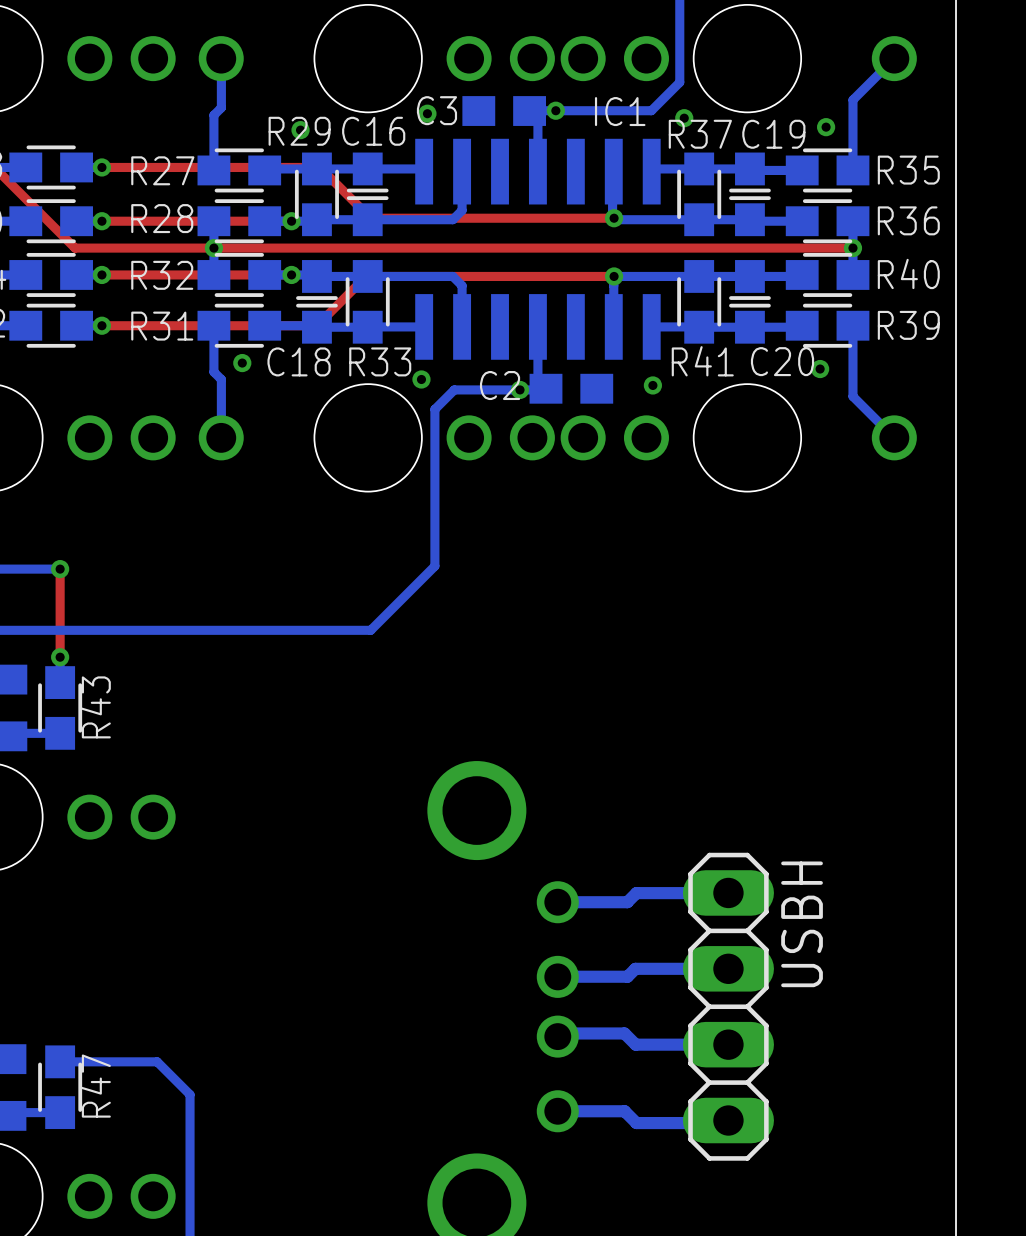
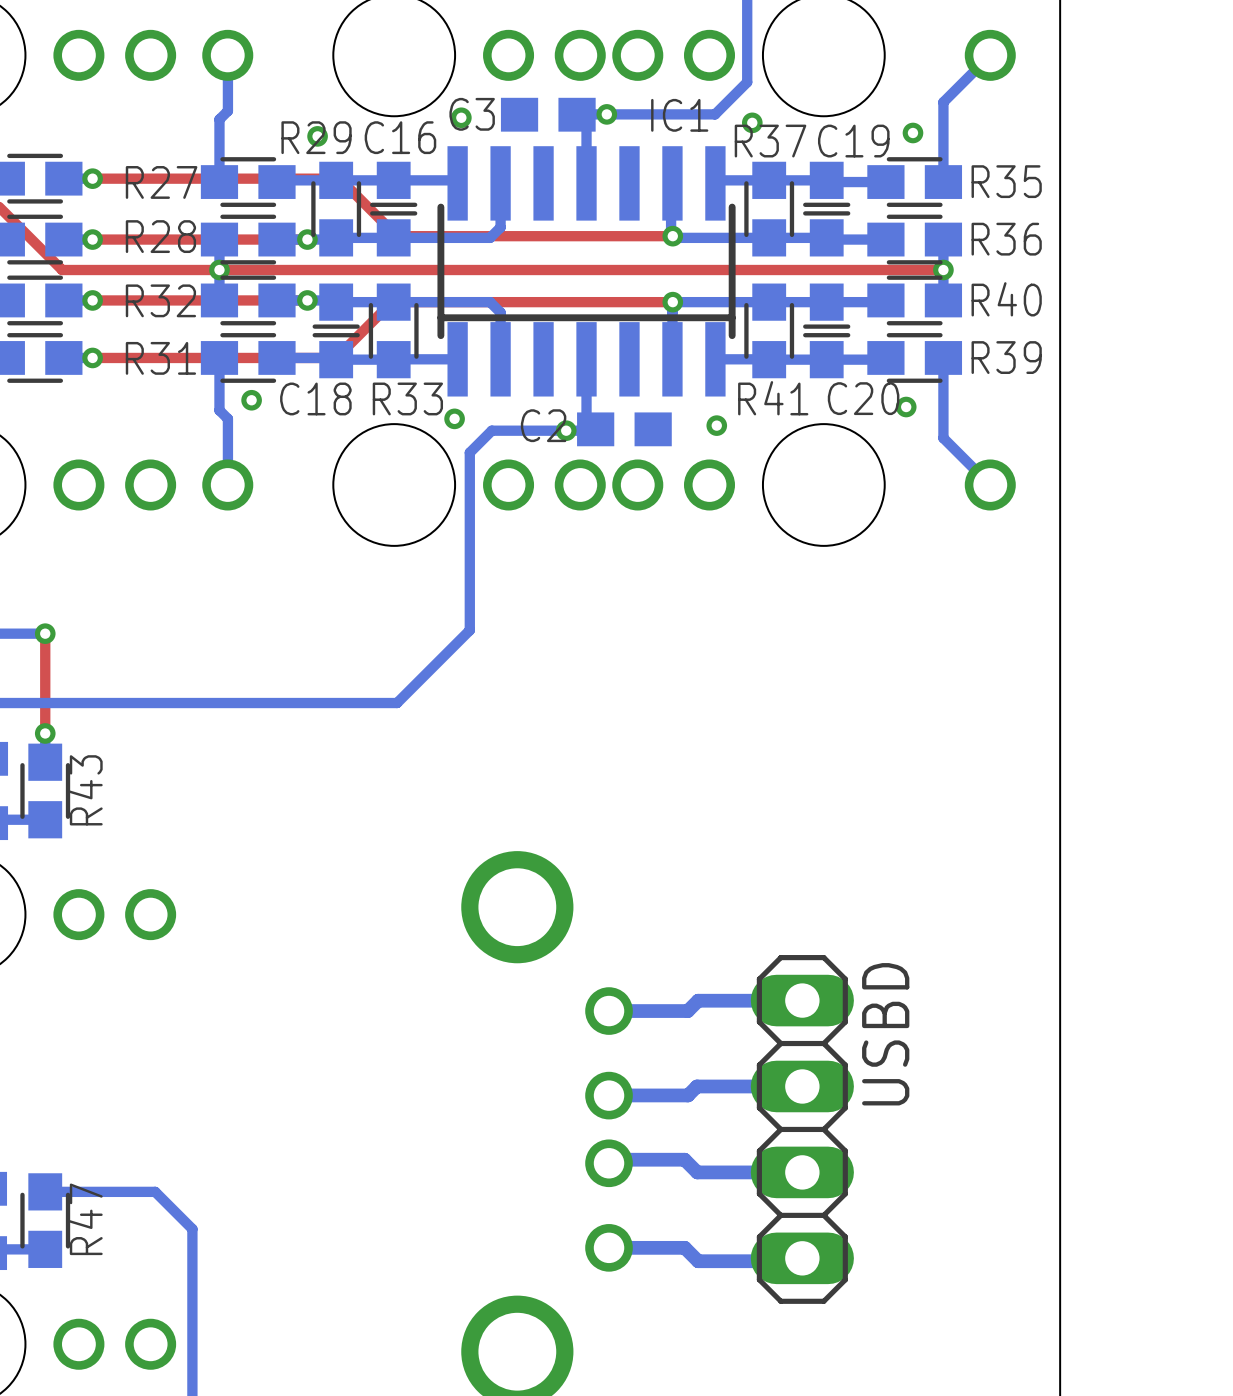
IC1 footprint: [415, 138, 661, 360] -> [437, 146, 736, 397]
USBH name: USBH (802, 924) -> USBD (885, 1034)

